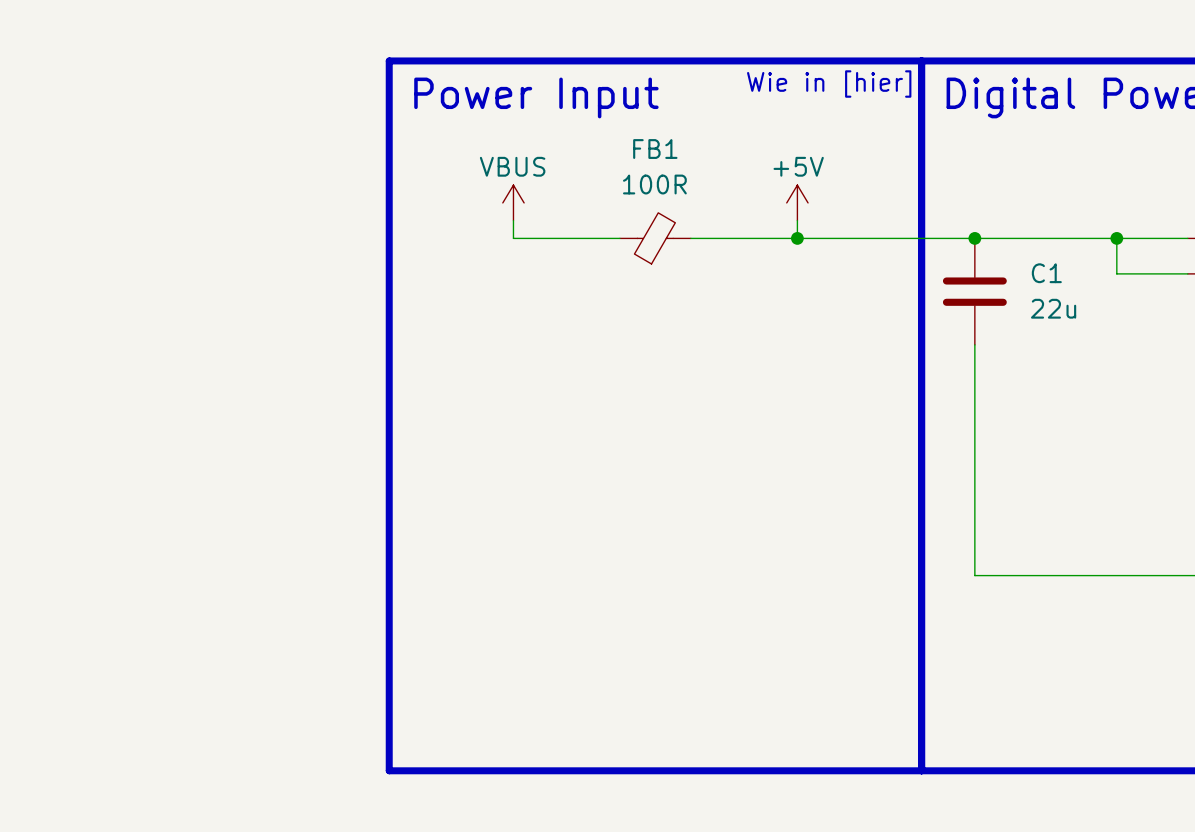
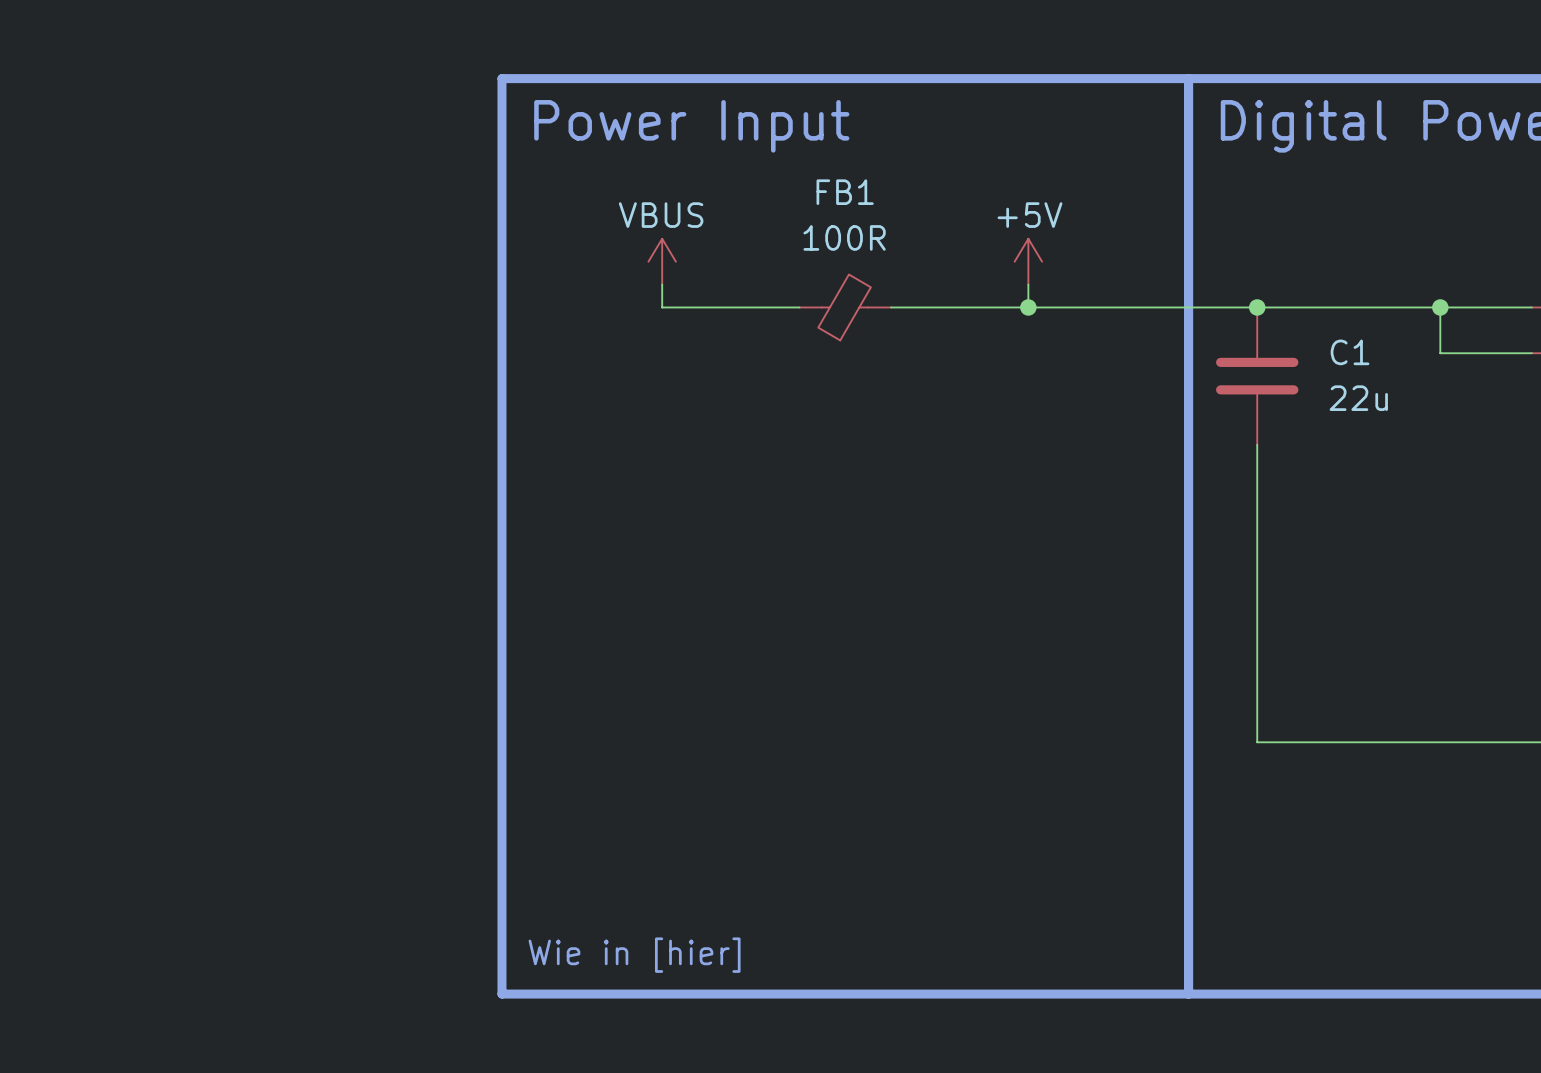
text: Wie in [hier] (829, 84) -> none
text: none -> Wie in [hier] (634, 955)

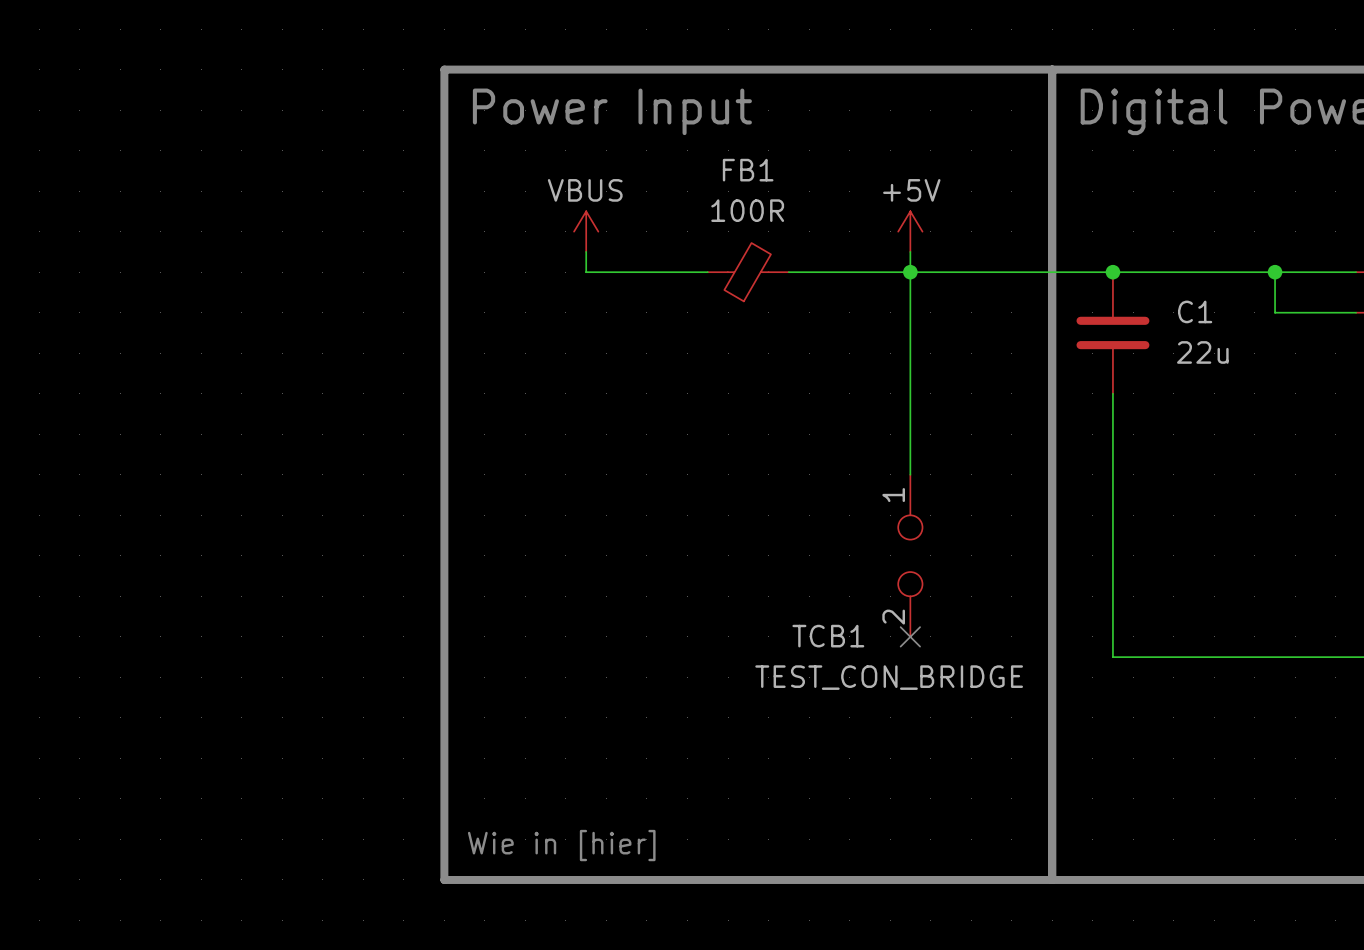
wire: none -> (910, 272) (910, 474)
TCB1: none -> TEST_CON_BRIDGE (910, 555)
no-connect mark: none -> (910, 636)

